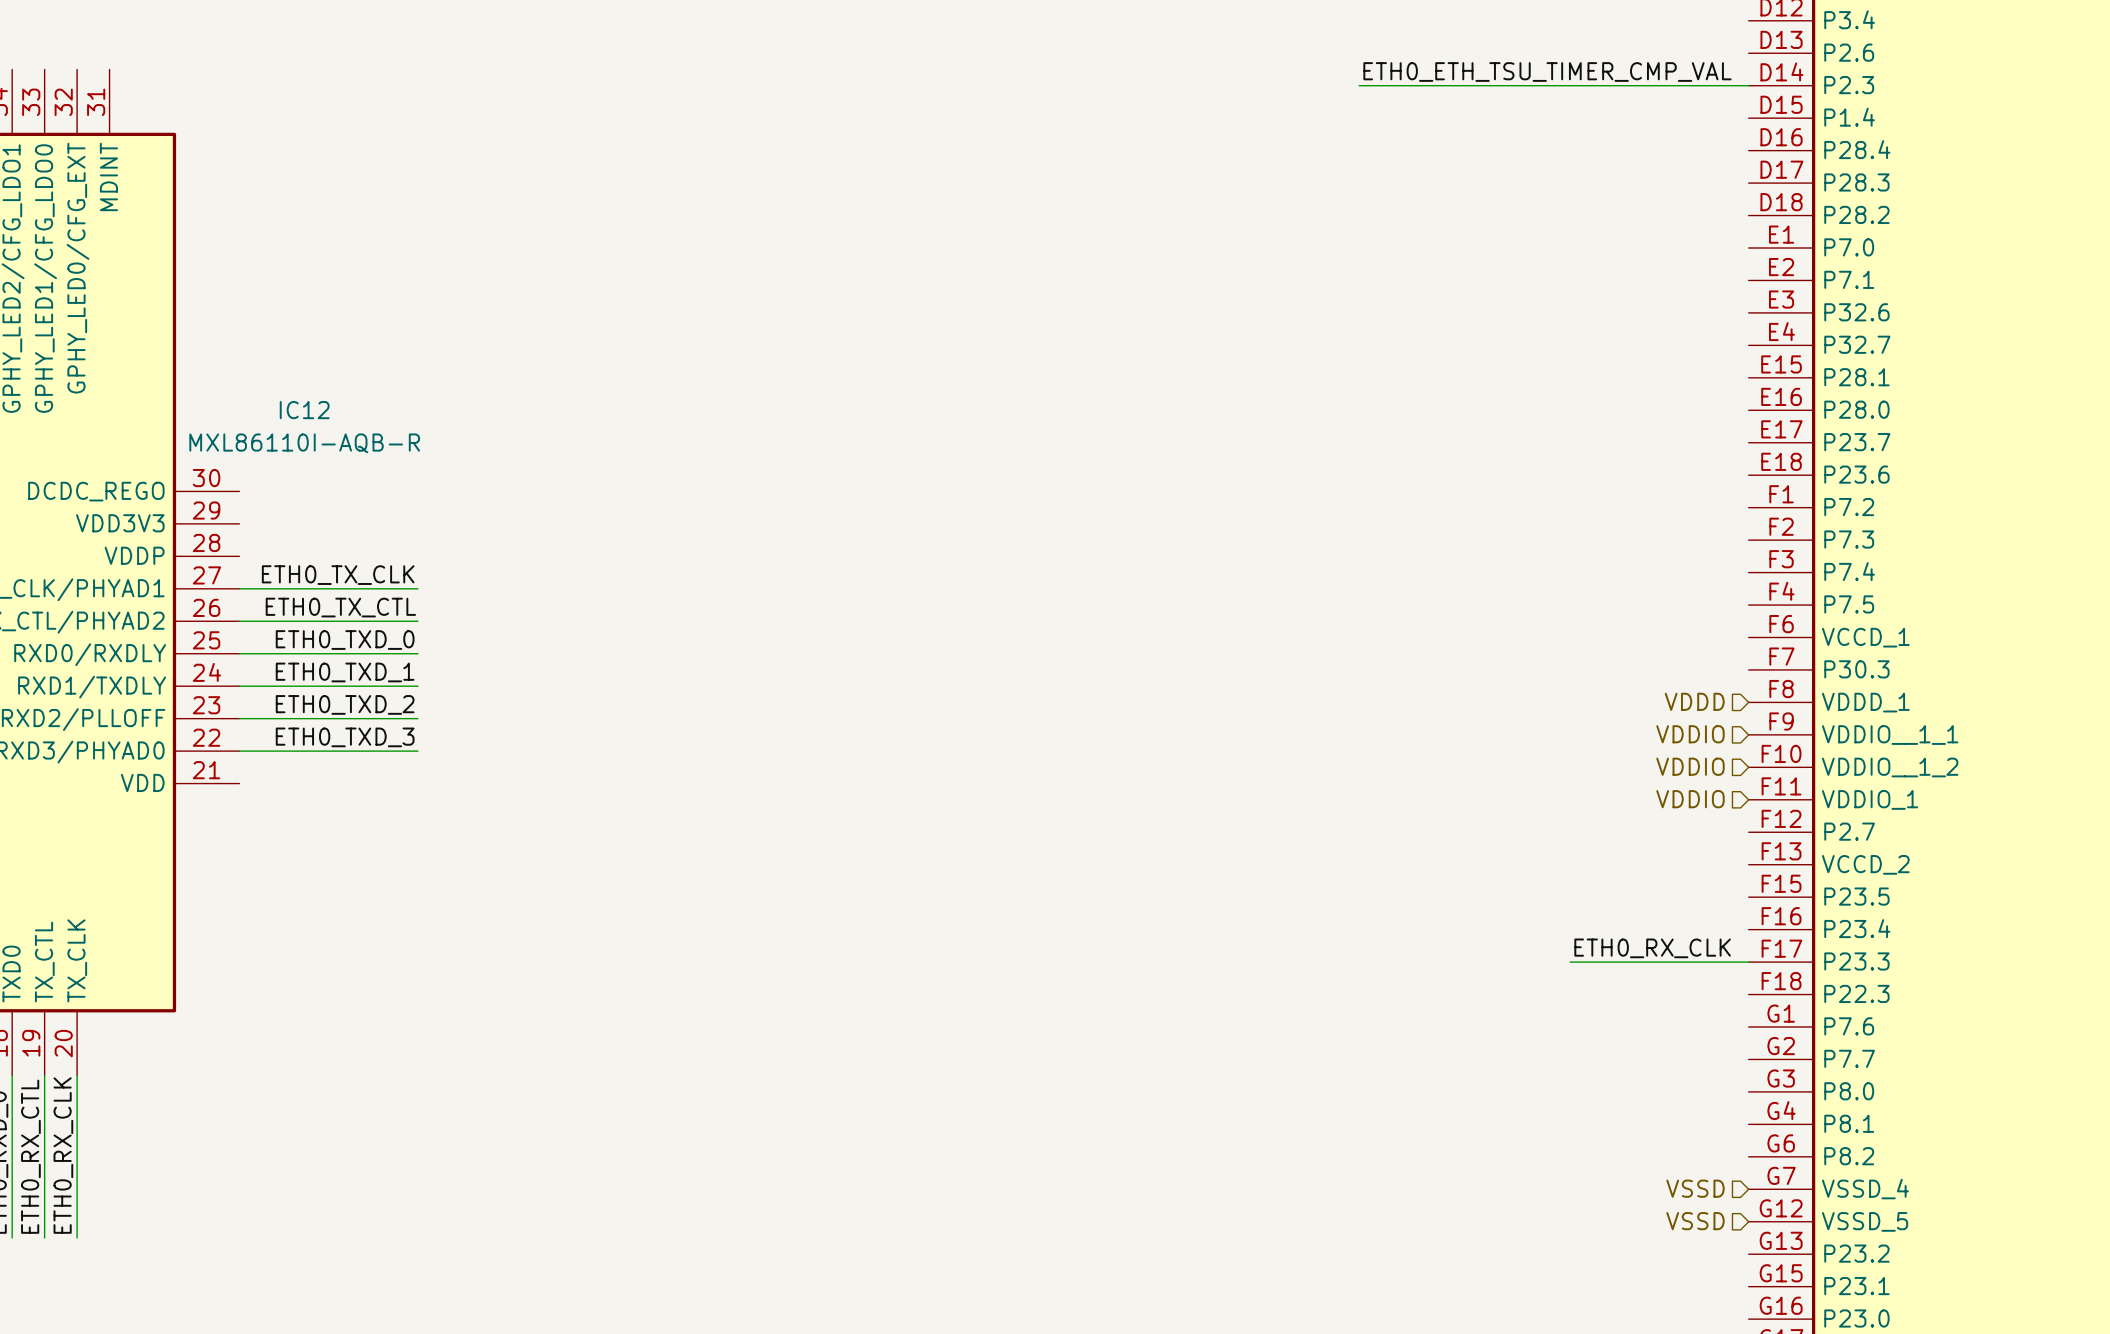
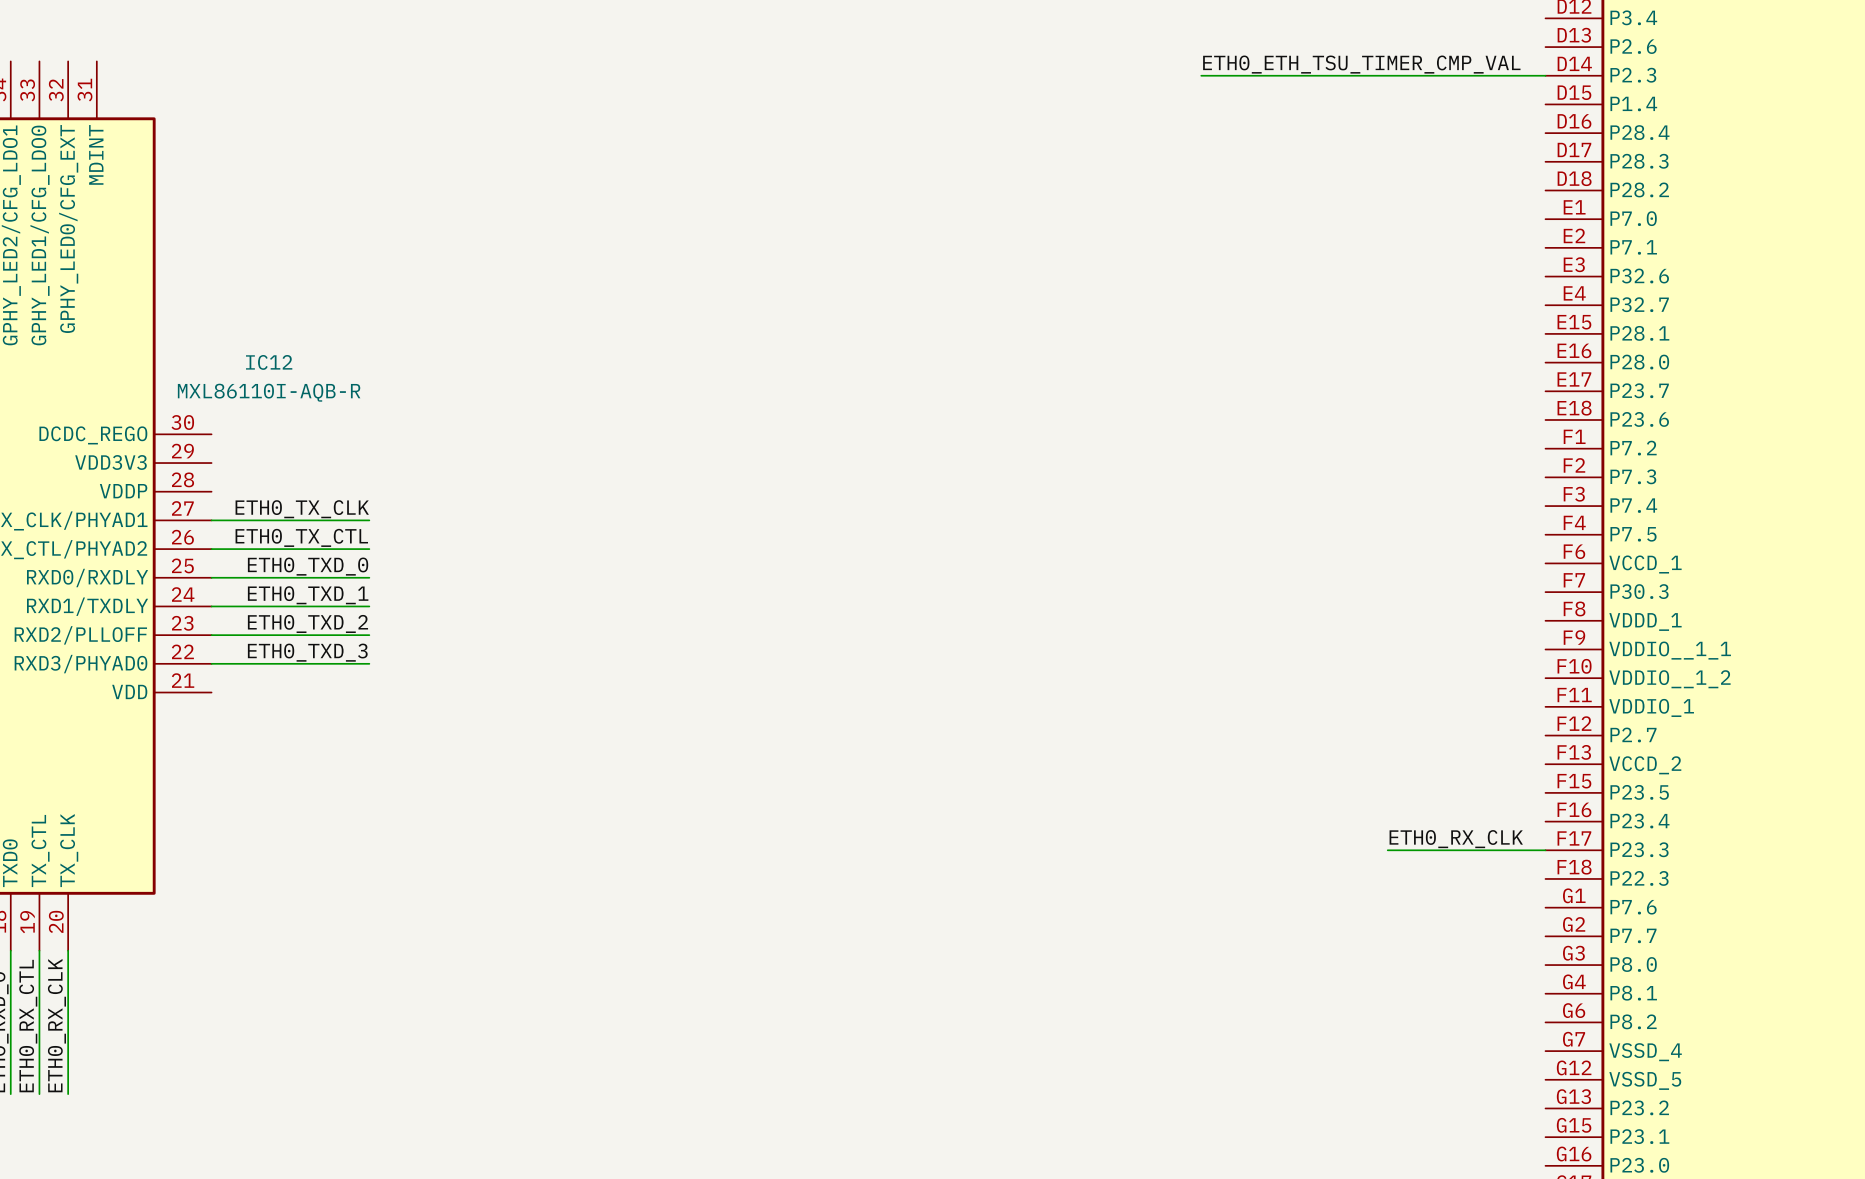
hierarchical label: VDDD (1694, 701) -> none
hierarchical label: VDDIO (1690, 734) -> none
hierarchical label: VDDIO (1690, 766) -> none
hierarchical label: VDDIO (1690, 799) -> none
hierarchical label: VSSD (1695, 1188) -> none
hierarchical label: VSSD (1695, 1221) -> none

